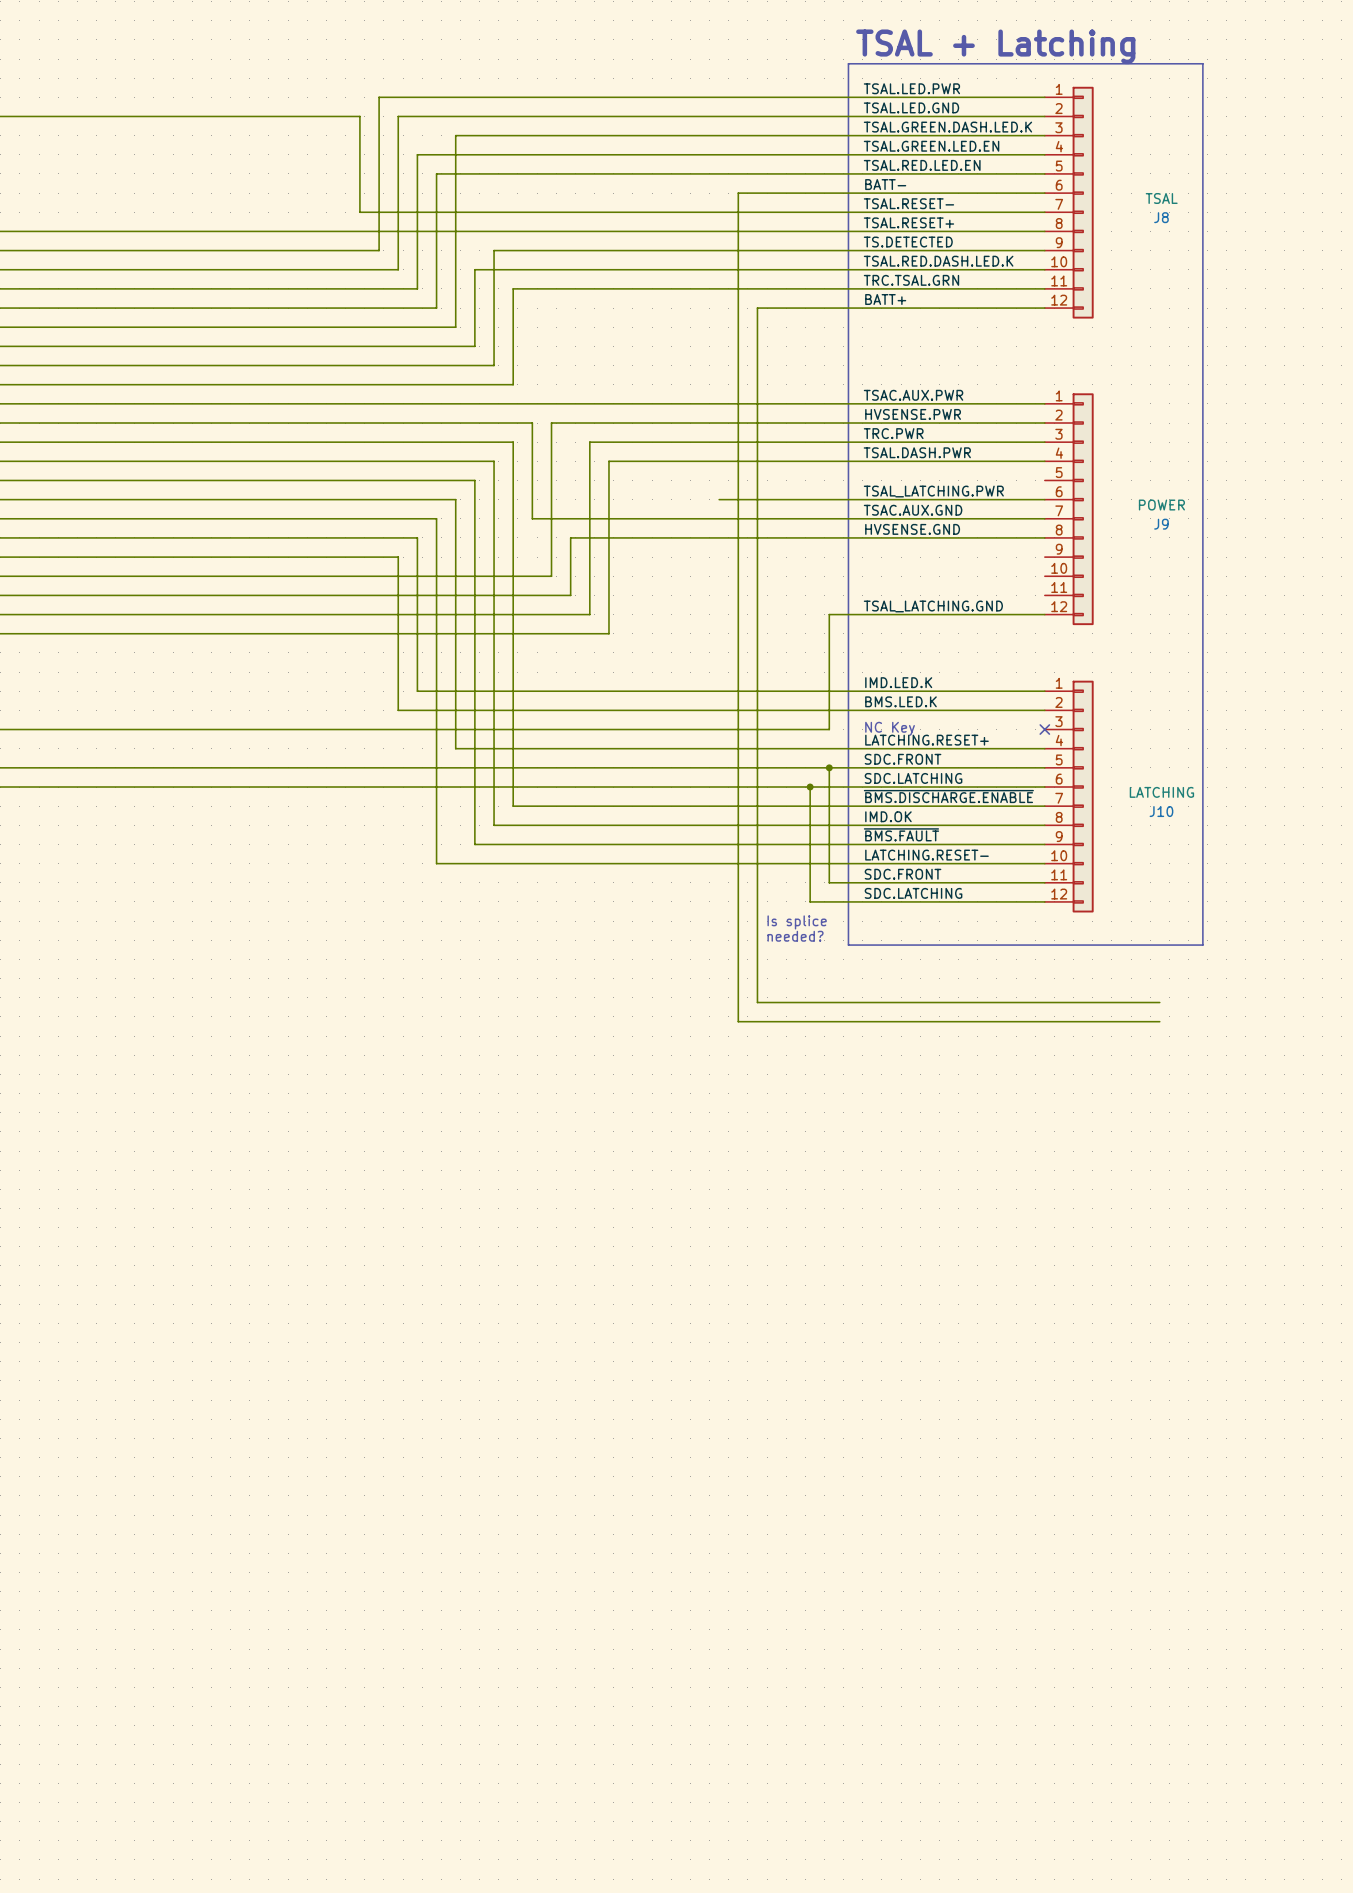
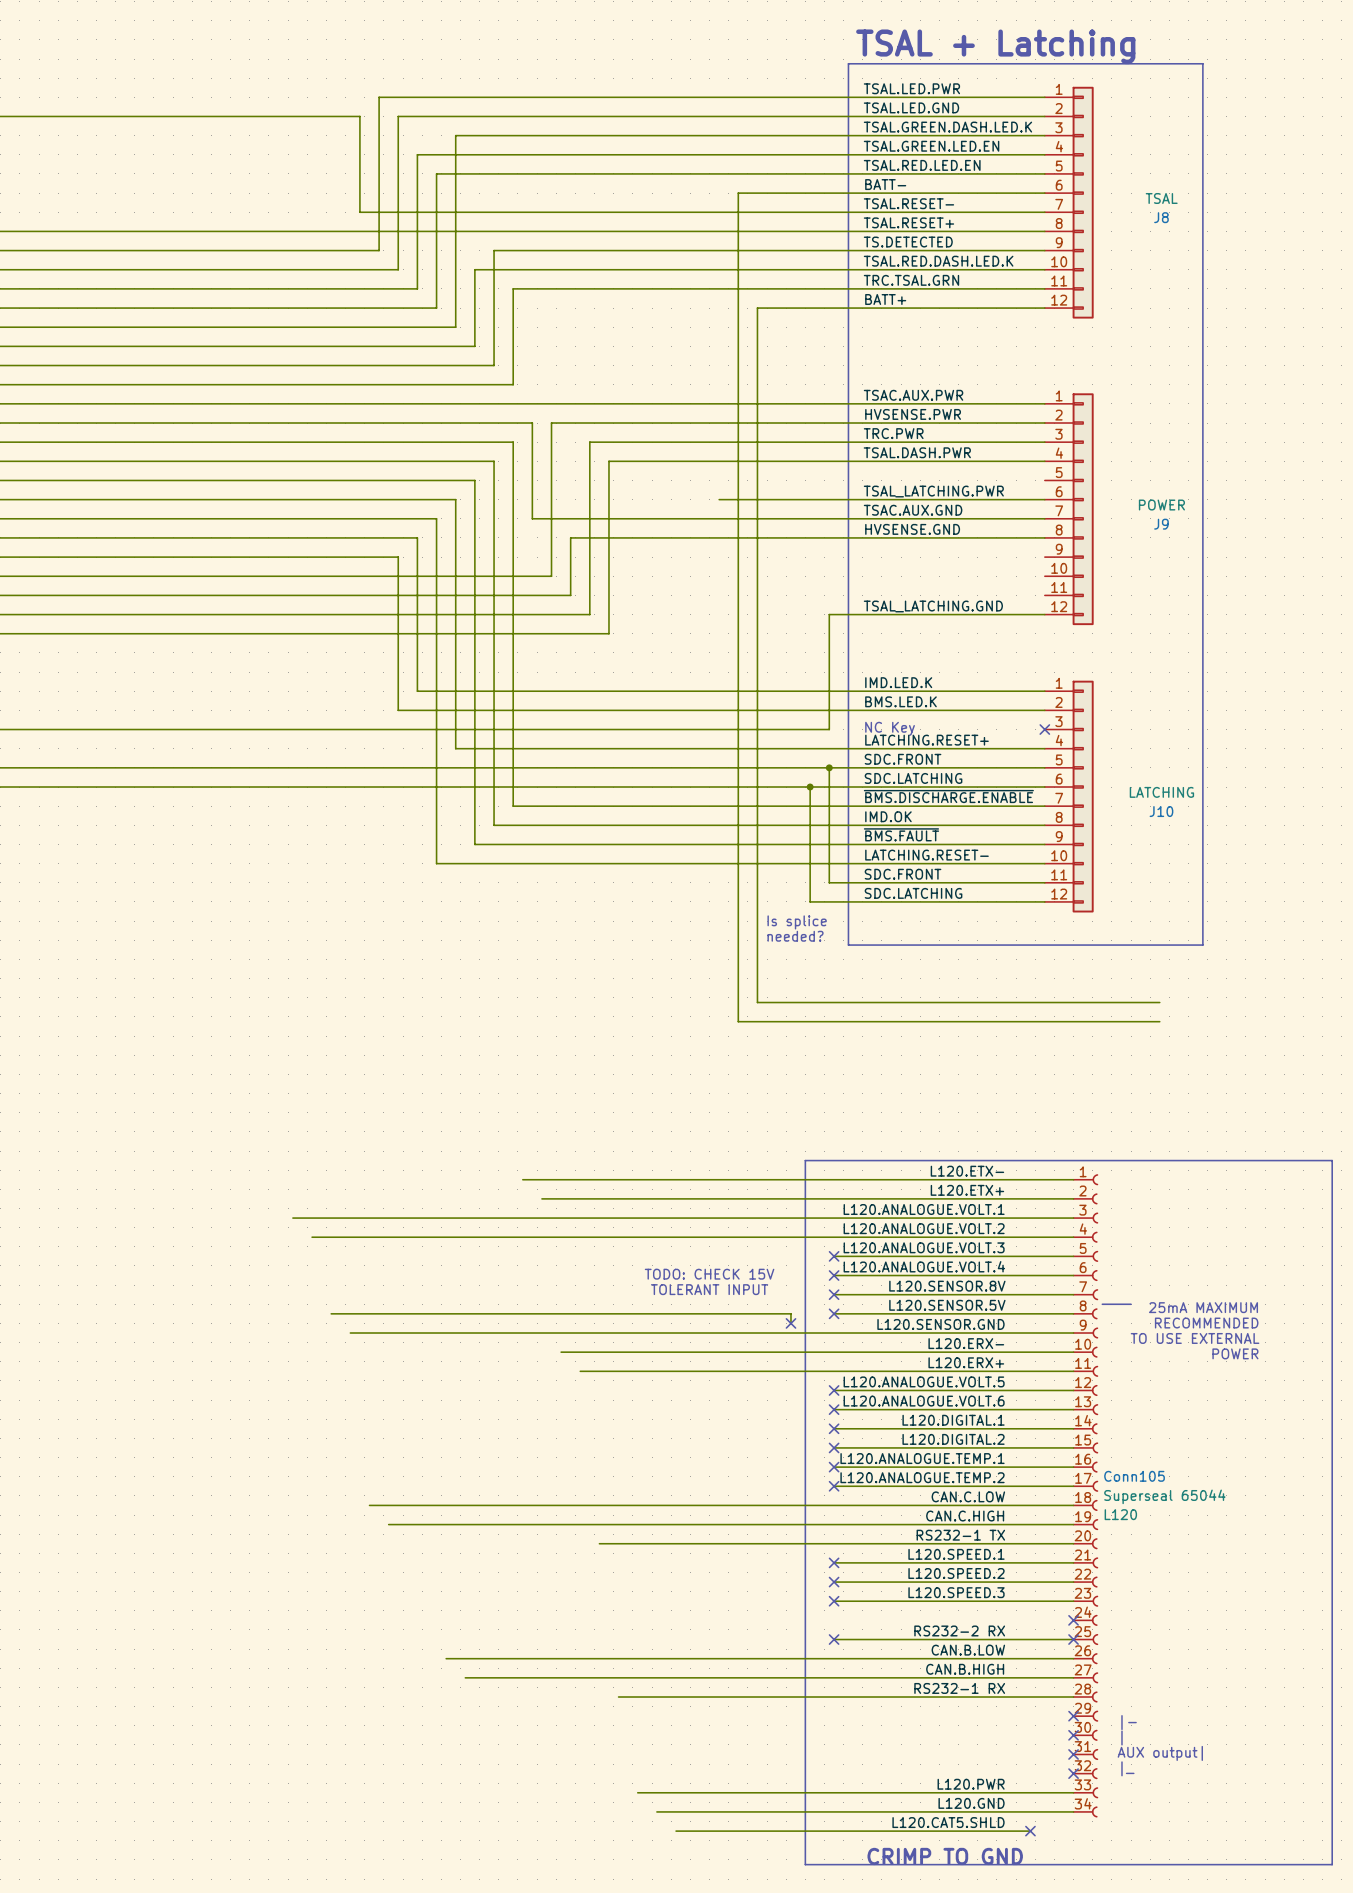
line: none -> (805, 1160) (1332, 1160) (1332, 1864) (805, 1864) (805, 1160)
label: none -> L120.ETX- (967, 1171)
wire: none -> (522, 1179) (1073, 1179)
label: none -> L120.ETX+ (967, 1190)
wire: none -> (541, 1198) (1073, 1198)
label: none -> L120.ANALOGUE.VOLT.1 (924, 1209)
wire: none -> (292, 1218) (1073, 1218)
label: none -> L120.ANALOGUE.VOLT.2 (924, 1228)
wire: none -> (312, 1237) (1073, 1237)
label: none -> L120.ANALOGUE.VOLT.3 (924, 1247)
wire: none -> (834, 1256) (1073, 1256)
no-connect mark: none -> (834, 1256)
label: none -> L120.ANALOGUE.VOLT.4 (924, 1266)
text: none -> TODO: CHECK 15V (709, 1274)
wire: none -> (834, 1275) (1073, 1275)
no-connect mark: none -> (834, 1275)
label: none -> L120.SENSOR.8V (947, 1286)
text: none -> TOLERANT INPUT (709, 1289)
wire: none -> (834, 1294) (1073, 1294)
no-connect mark: none -> (834, 1294)
line: none -> (1102, 1304) (1131, 1304)
label: none -> L120.SENSOR.5V (947, 1305)
text: none -> 25mA MAXIMUM (1203, 1307)
wire: none -> (331, 1313) (790, 1313) (790, 1323)
wire: none -> (834, 1313) (1073, 1313)
no-connect mark: none -> (834, 1313)
no-connect mark: none -> (790, 1323)
text: none -> RECOMMENDED (1206, 1323)
label: none -> L120.SENSOR.GND (940, 1324)
wire: none -> (350, 1333) (1073, 1333)
text: none -> TO USE EXTERNAL (1195, 1338)
label: none -> L120.ERX- (966, 1343)
wire: none -> (561, 1352) (1073, 1352)
text: none -> POWER (1235, 1353)
label: none -> L120.ERX+ (966, 1362)
wire: none -> (580, 1371) (1073, 1371)
label: none -> L120.ANALOGUE.VOLT.5 (924, 1381)
wire: none -> (834, 1390) (1073, 1390)
no-connect mark: none -> (834, 1390)
label: none -> L120.ANALOGUE.VOLT.6 (924, 1401)
wire: none -> (834, 1409) (1073, 1409)
no-connect mark: none -> (834, 1409)
label: none -> L120.DIGITAL.1 (953, 1420)
wire: none -> (834, 1428) (1073, 1428)
no-connect mark: none -> (834, 1428)
label: none -> L120.DIGITAL.2 (953, 1439)
wire: none -> (834, 1447) (1073, 1447)
no-connect mark: none -> (834, 1447)
label: none -> L120.ANALOGUE.TEMP.1 (922, 1458)
wire: none -> (834, 1467) (1073, 1467)
no-connect mark: none -> (834, 1467)
label: none -> L120.ANALOGUE.TEMP.2 (922, 1477)
wire: none -> (834, 1486) (1073, 1486)
no-connect mark: none -> (834, 1486)
Conn105: none -> (1085, 1495)
label: none -> CAN.C.LOW (968, 1496)
wire: none -> (369, 1505) (1073, 1505)
label: none -> CAN.C.HIGH (965, 1516)
wire: none -> (388, 1524) (1073, 1524)
label: none -> RS232-1 TX (960, 1535)
wire: none -> (599, 1543) (1073, 1543)
label: none -> L120.SPEED.1 (956, 1554)
wire: none -> (834, 1562) (1073, 1562)
no-connect mark: none -> (834, 1562)
label: none -> L120.SPEED.2 (956, 1573)
wire: none -> (834, 1582) (1073, 1582)
no-connect mark: none -> (834, 1582)
label: none -> L120.SPEED.3 (956, 1592)
wire: none -> (834, 1601) (1073, 1601)
no-connect mark: none -> (834, 1601)
no-connect mark: none -> (1073, 1620)
label: none -> RS232-2 RX (959, 1630)
wire: none -> (834, 1639) (1073, 1639)
no-connect mark: none -> (834, 1639)
no-connect mark: none -> (1073, 1639)
label: none -> CAN.B.LOW (968, 1650)
wire: none -> (446, 1658) (1073, 1658)
label: none -> CAN.B.HIGH (965, 1669)
wire: none -> (465, 1677) (1073, 1677)
label: none -> RS232-1 RX (959, 1688)
wire: none -> (618, 1697) (1073, 1697)
no-connect mark: none -> (1073, 1716)
text: none -> |- (1129, 1722)
no-connect mark: none -> (1073, 1735)
text: none -> | (1121, 1738)
text: none -> AUX output| (1160, 1753)
no-connect mark: none -> (1073, 1754)
text: none -> |_ (1127, 1768)
no-connect mark: none -> (1073, 1773)
label: none -> L120.PWR (971, 1784)
wire: none -> (637, 1792) (1073, 1792)
label: none -> L120.GND (971, 1803)
wire: none -> (656, 1811) (1073, 1811)
label: none -> L120.CAT5.SHLD (948, 1822)
wire: none -> (676, 1831) (1030, 1831)
no-connect mark: none -> (1030, 1831)
text: none -> CRIMP TO GND (945, 1856)

